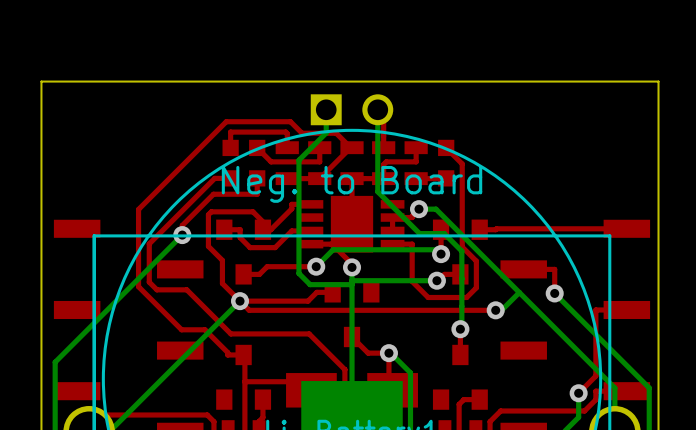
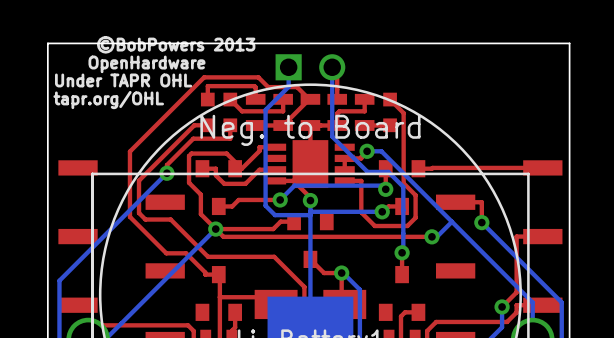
text: none -> ©BobPowers 2013 (176, 44)
text: none -> OpenHardware (146, 64)
text: none -> Under TAPR OHL (123, 80)
text: none -> tapr.org/OHL (108, 100)

